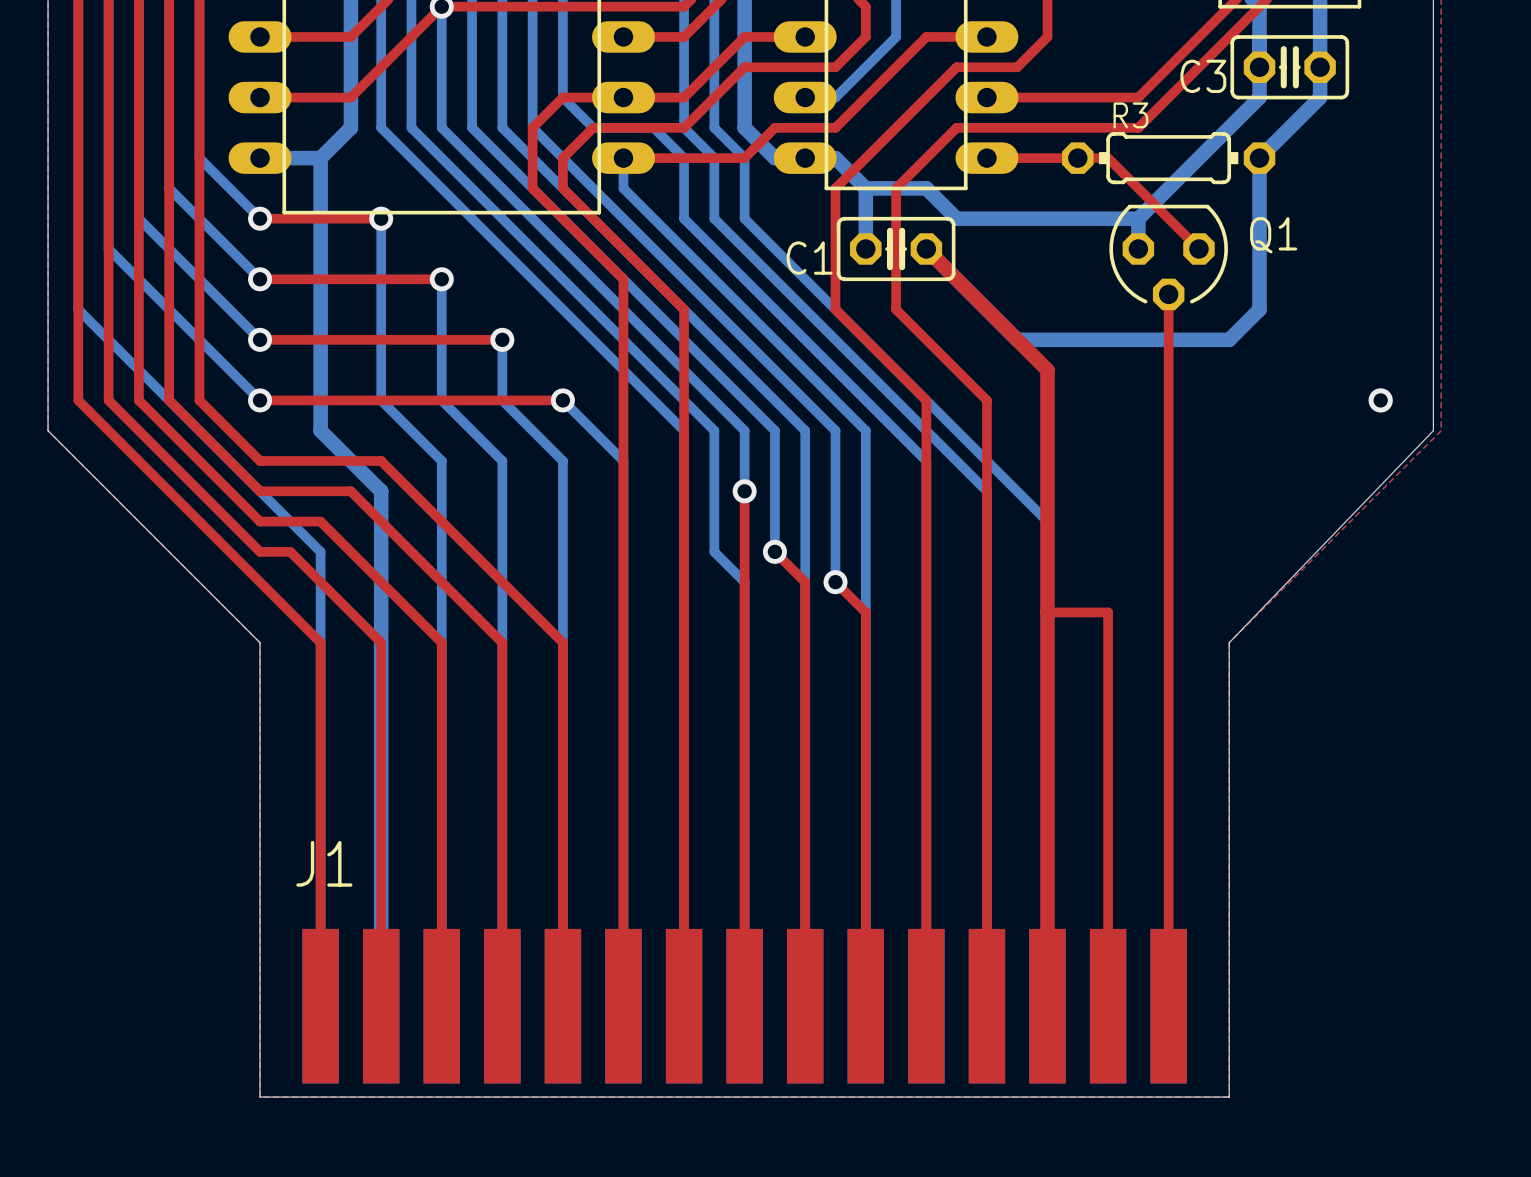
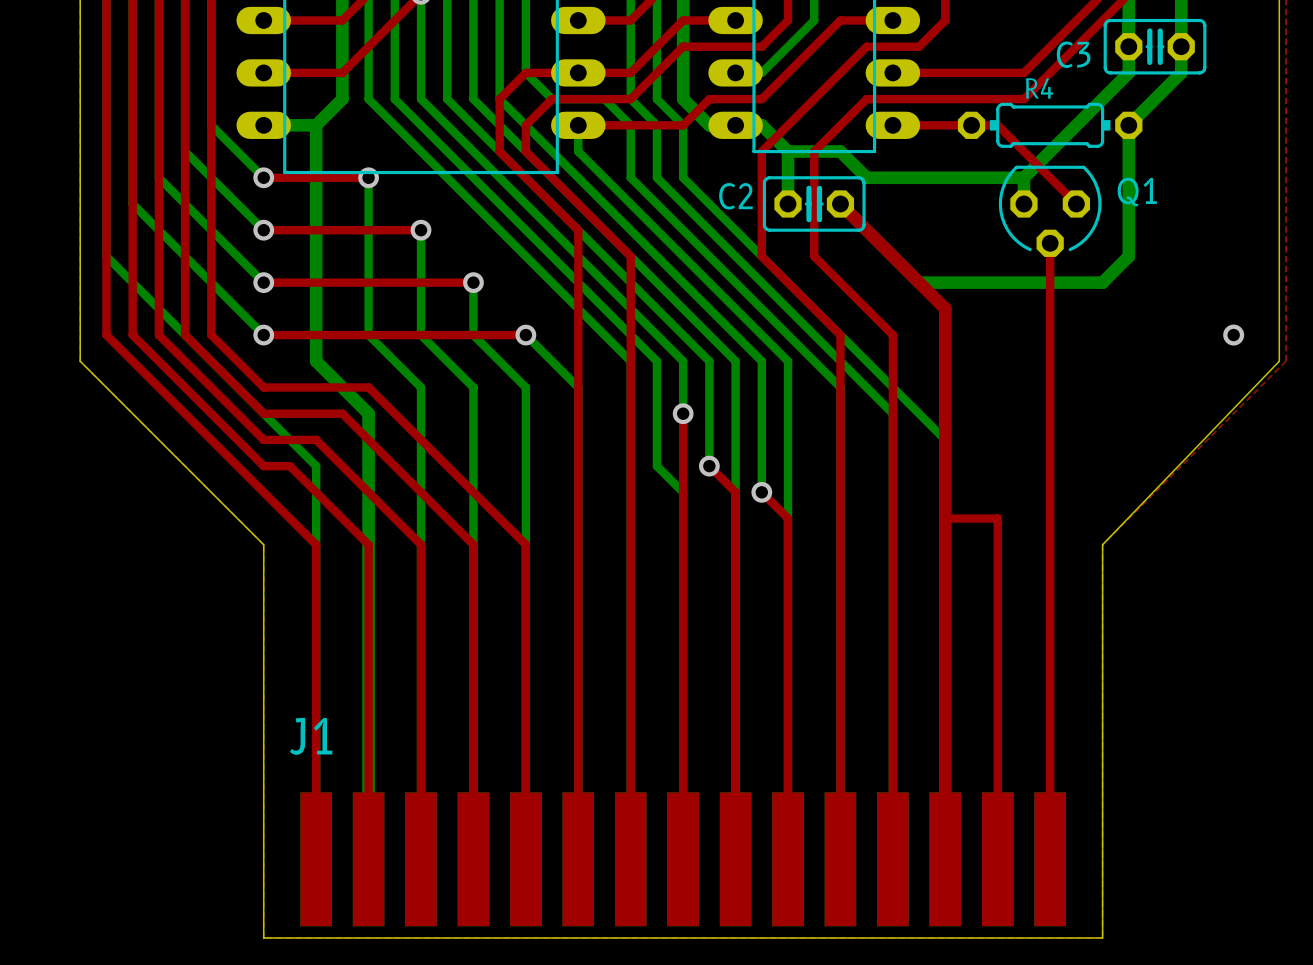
R3 name: R3 (1130, 115) -> R4 (1039, 88)
C1 name: C1 (809, 258) -> C2 (735, 196)

